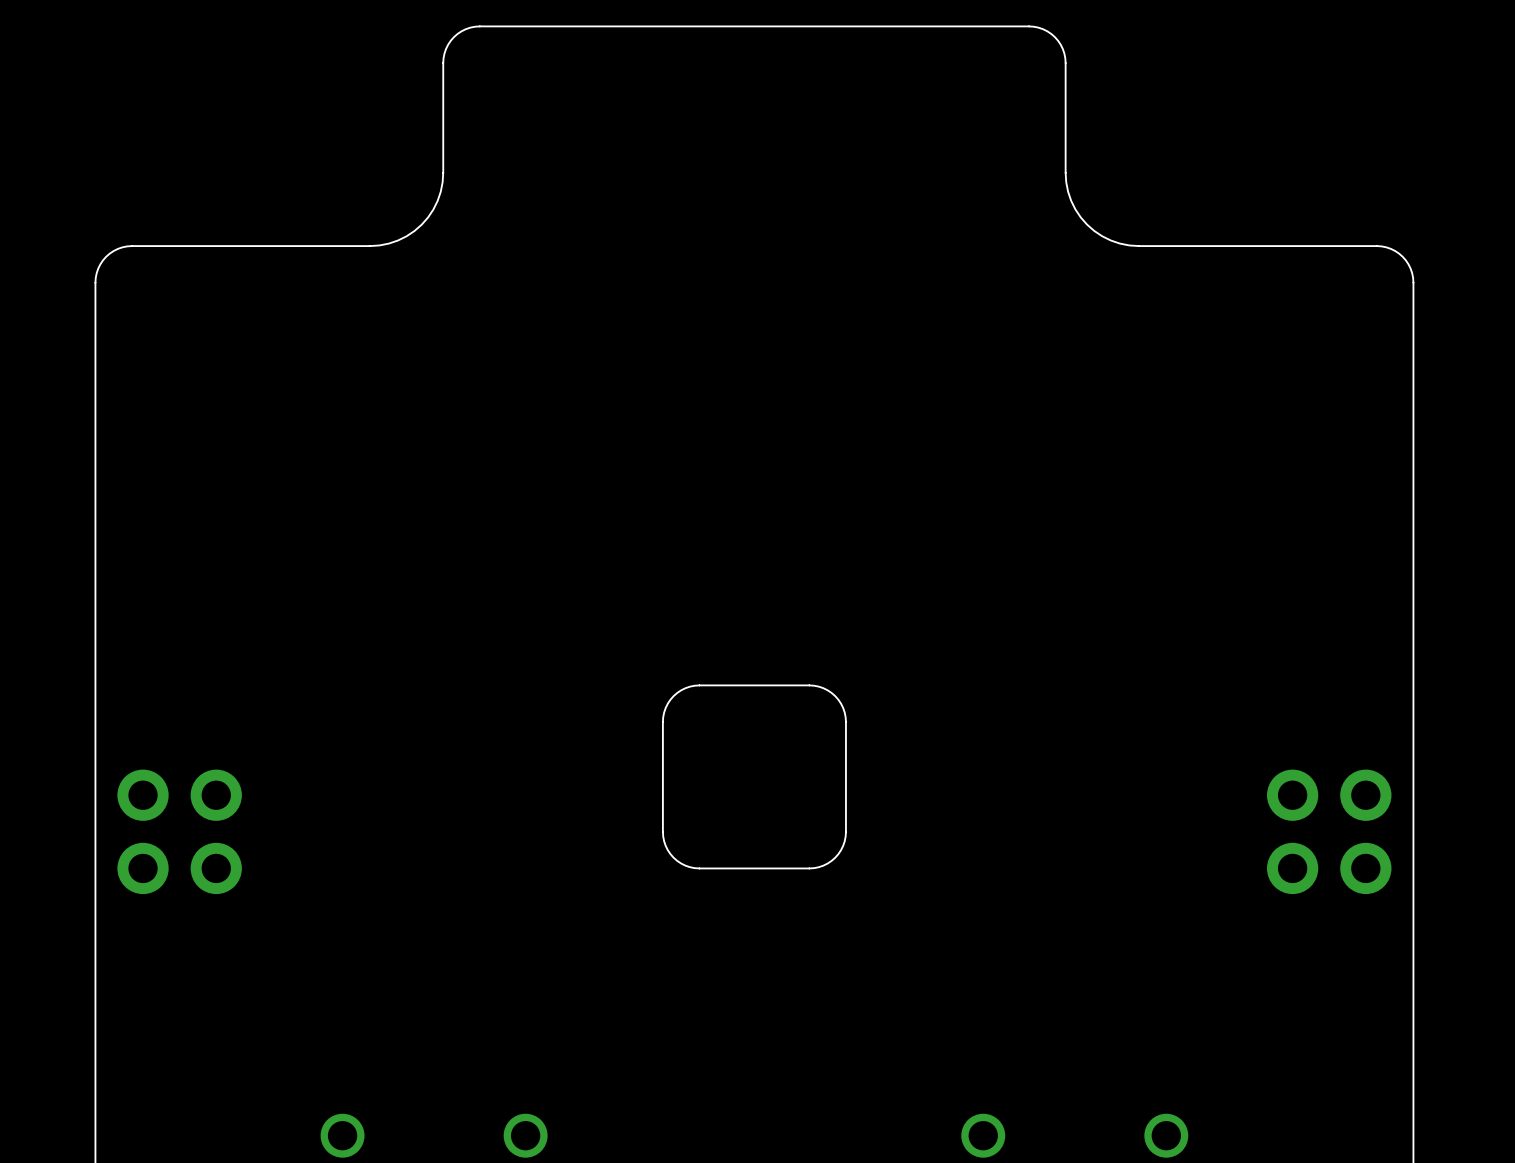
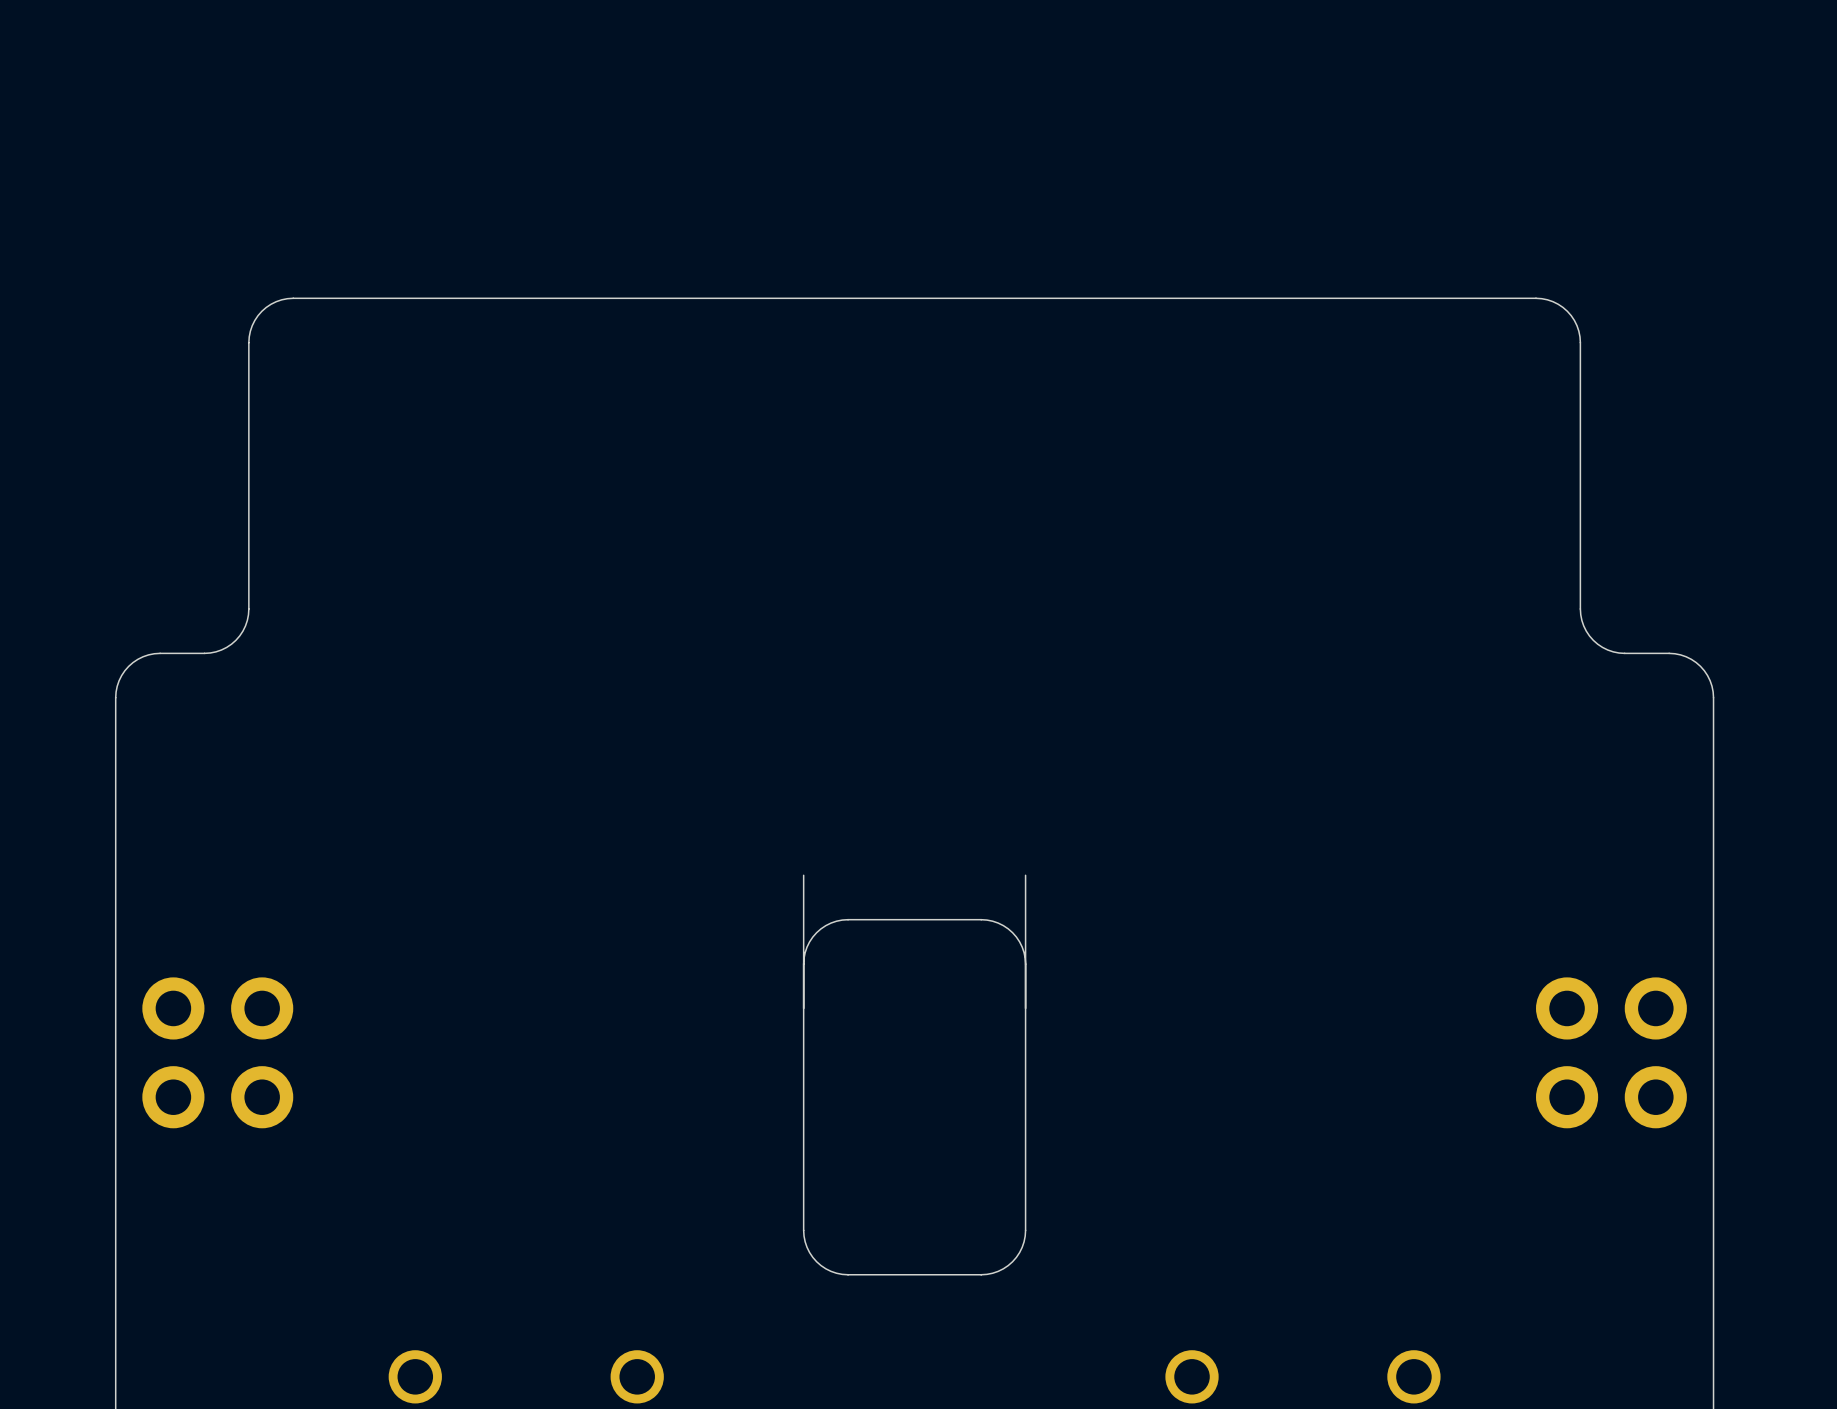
board edge: (241, 246) (127, 246) (109, 253) (98, 268) (95, 282) (95, 575) -> (293, 298) (276, 301) (266, 307) (254, 320) (249, 336) (248, 608) (245, 625) (239, 636) (231, 644) (215, 651) (154, 653) (137, 659) (128, 666) (121, 675) (117, 686) (115, 697)
board edge: (1138, 246) (1119, 243) (1102, 236) (1087, 224) (1075, 209) (1066, 182) (1064, 53) (1058, 40) (1051, 33) (1043, 29) (1029, 26) (470, 27) (457, 33) (450, 40) (443, 58) (443, 172) (437, 200) (421, 224) (406, 236) (388, 243) (370, 246) -> (1380, 298) (448, 298)
board edge: (1266, 246) (1381, 246) (1399, 253) (1410, 268) (1413, 282) (1413, 575) -> (1535, 298) (1552, 301) (1563, 307) (1574, 320) (1580, 336) (1580, 608) (1583, 625) (1589, 636) (1597, 644) (1613, 651) (1674, 653) (1691, 659) (1700, 666) (1707, 675) (1712, 686) (1713, 697)
board edge: (845, 722) (843, 707) (835, 696) (823, 688) (809, 685) (690, 686) (677, 692) (670, 699) (665, 707) (662, 722) -> (1025, 964) (1022, 947) (1012, 932) (998, 923) (981, 919) (836, 921) (821, 928) (812, 937) (807, 947) (803, 964)
part position: (179, 831) -> (217, 1052)
board edge: (845, 831) (843, 845) (835, 857) (823, 865) (809, 868) (690, 867) (677, 860) (670, 854) (665, 845) (662, 831) -> (1025, 1008) (1025, 1236) (1019, 1252) (1008, 1265) (998, 1271) (981, 1274) (842, 1274) (831, 1271) (821, 1265) (809, 1252) (805, 1241) (803, 1230) (803, 1008)
part position: (1329, 831) -> (1611, 1052)

